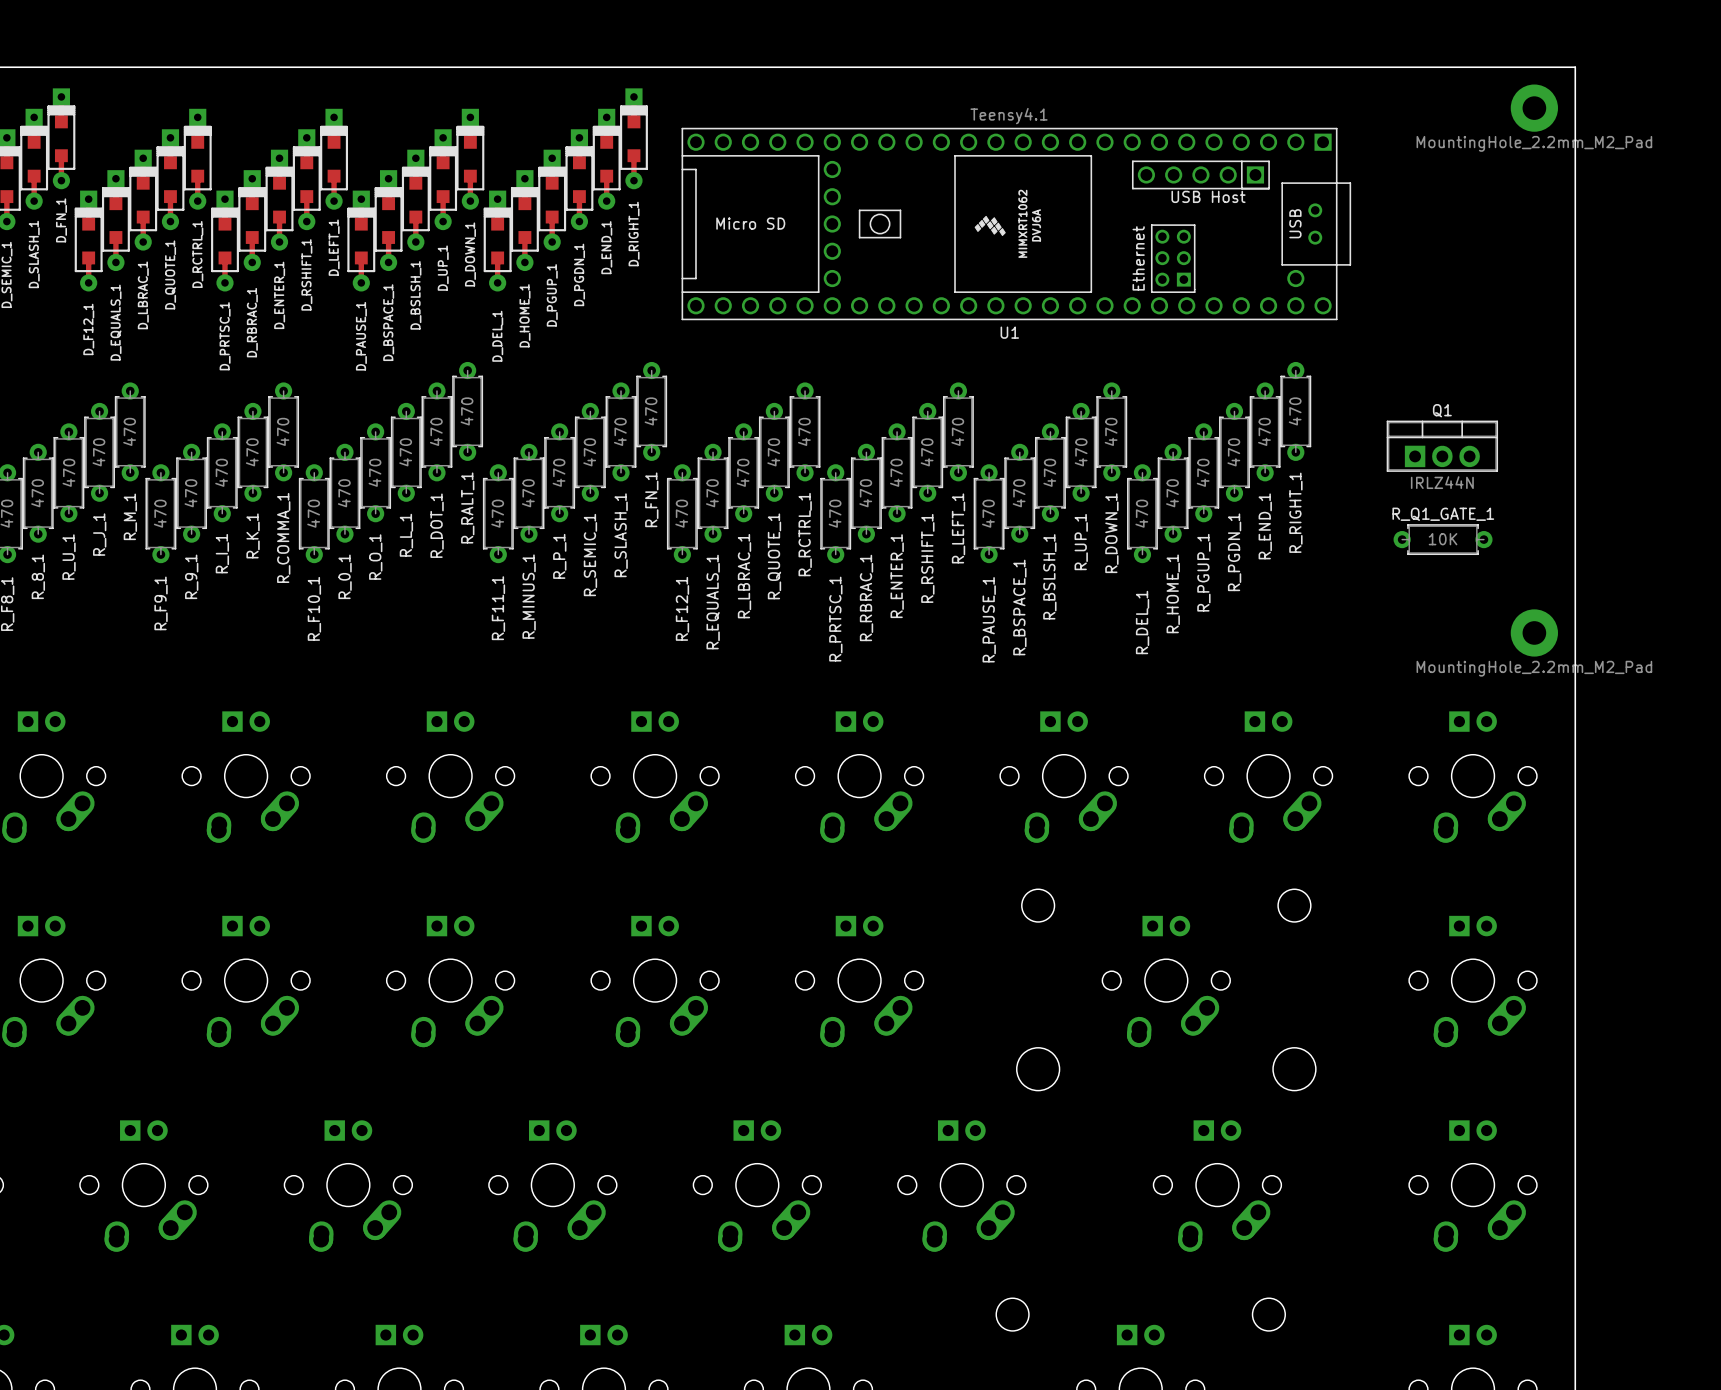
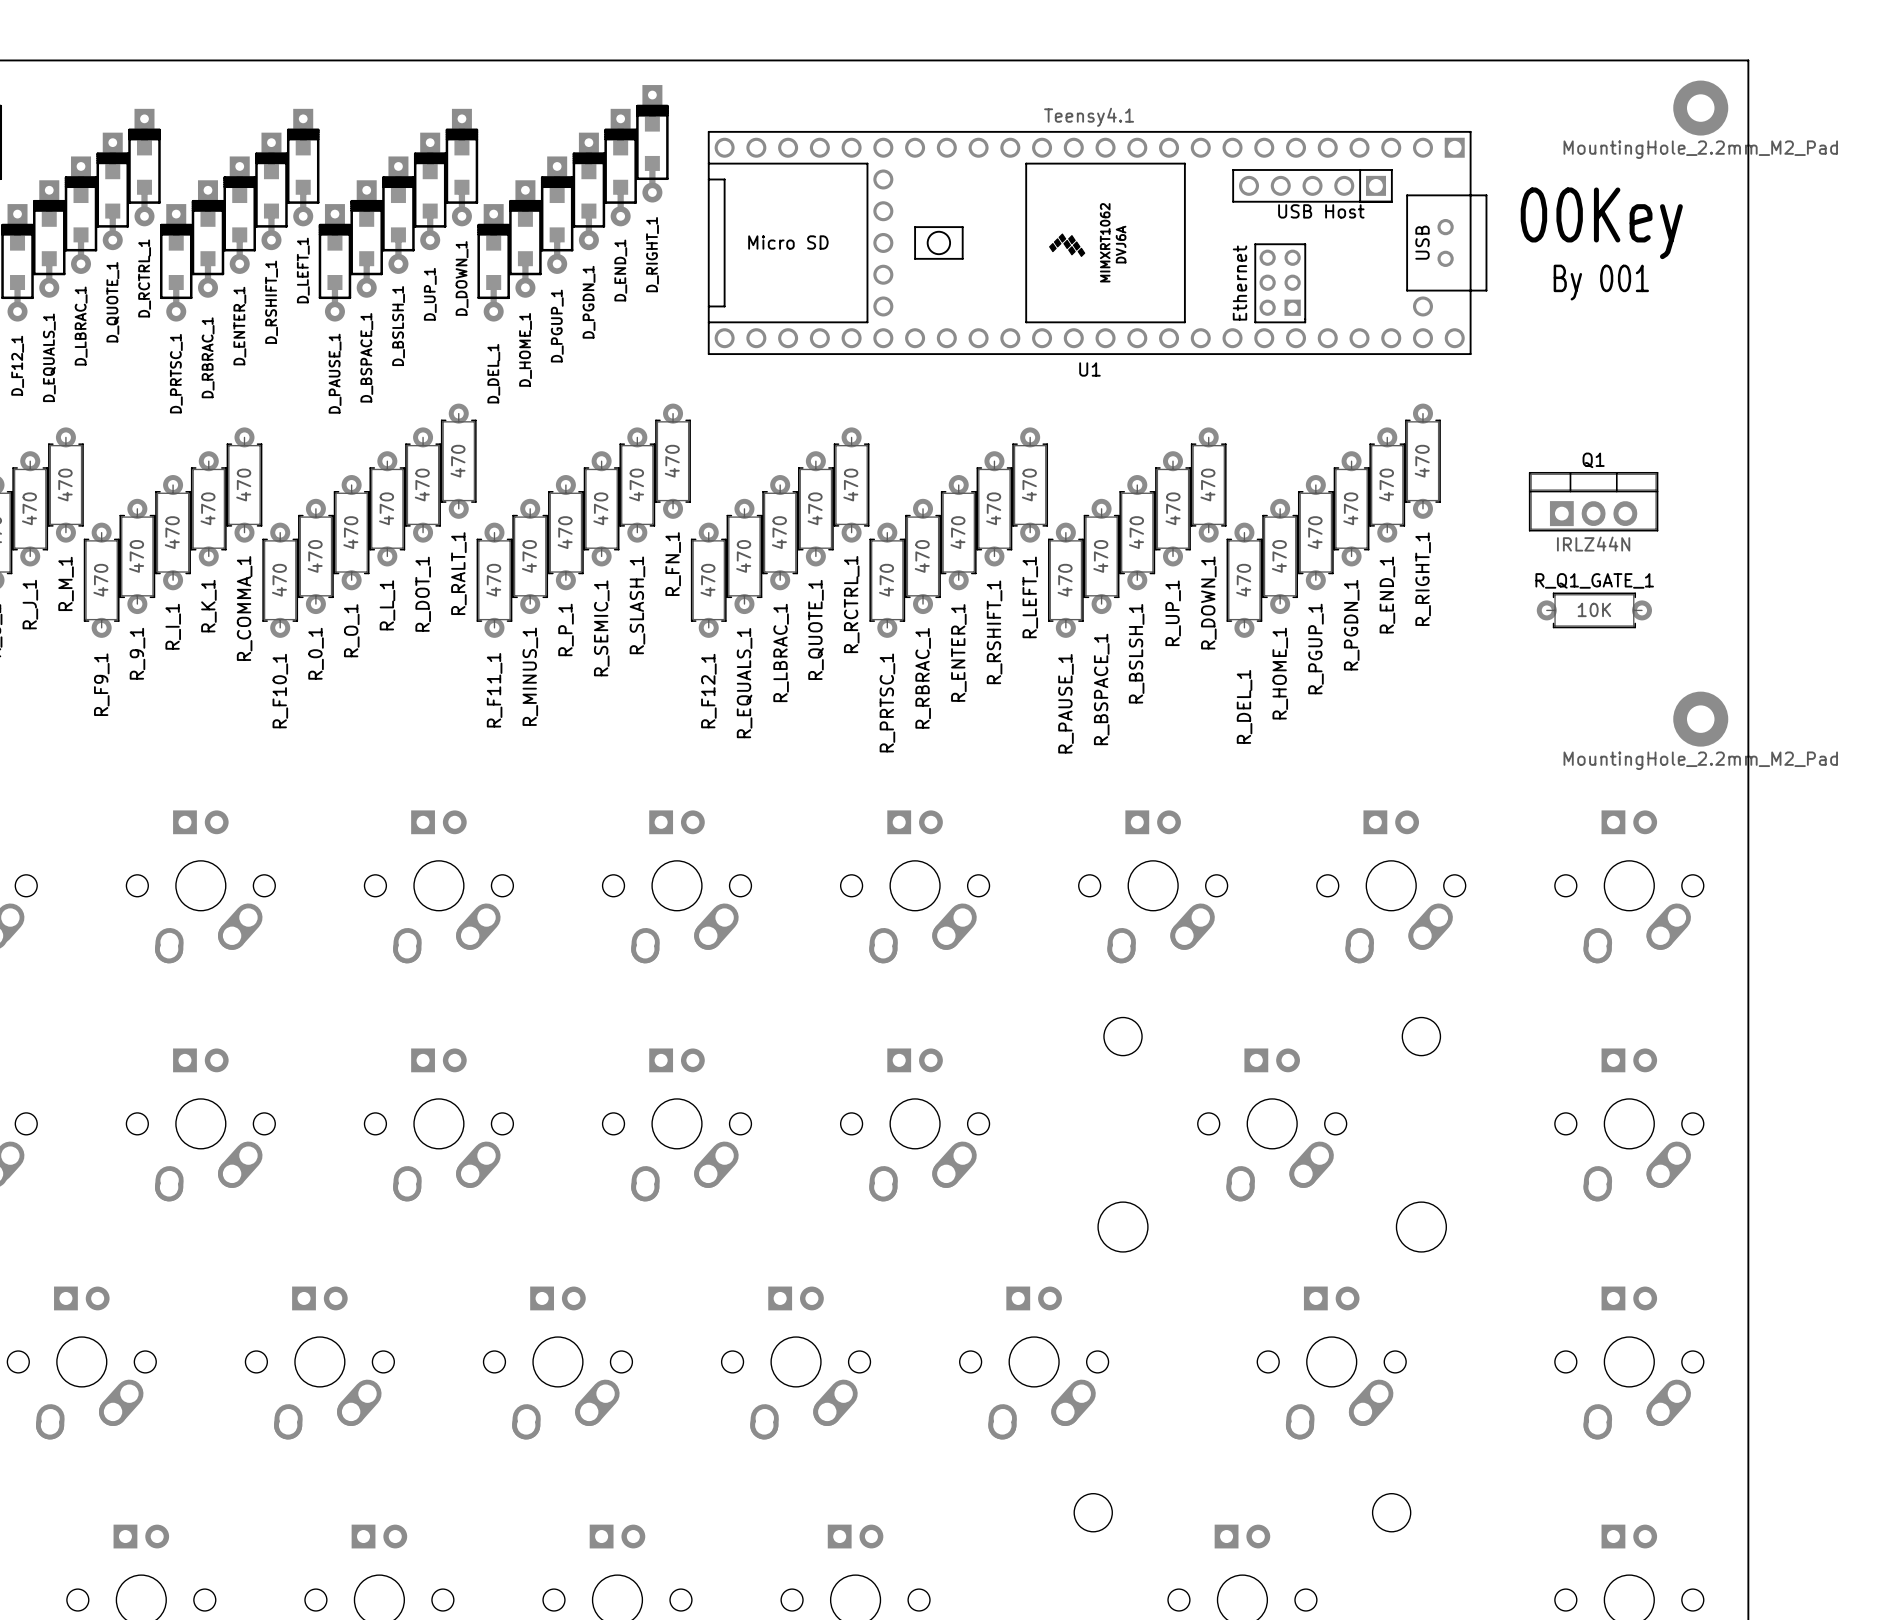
text: none -> 00Key (1601, 223)
text: none -> By 001 (1601, 282)

